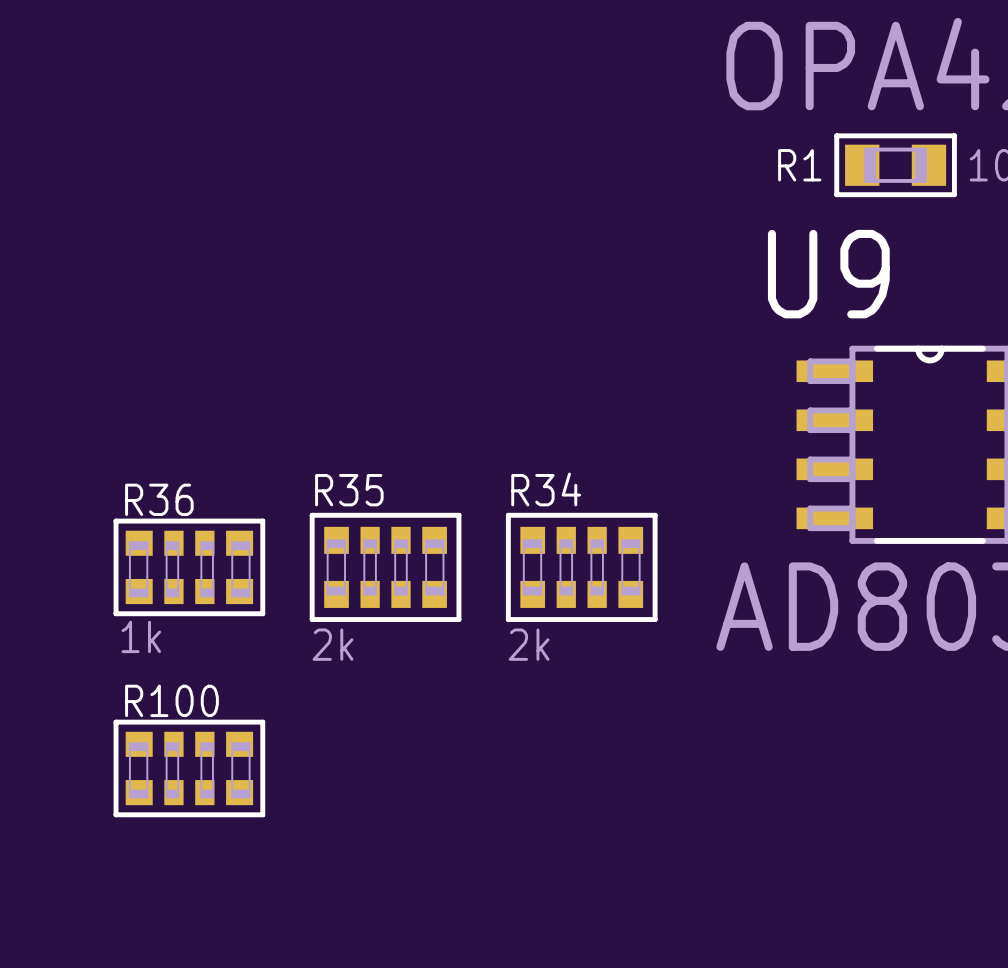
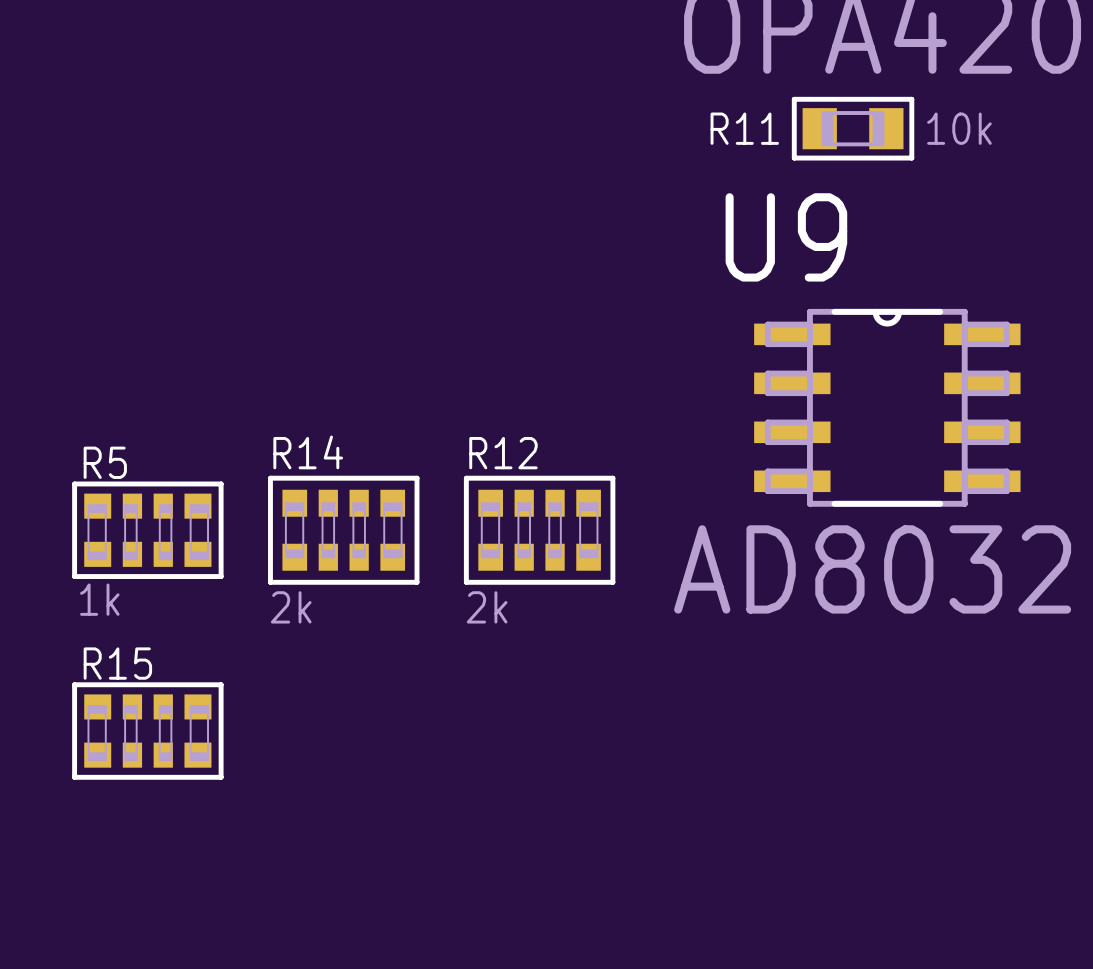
R1 name: R1 (799, 165) -> R11 (744, 128)
R34 name: R34 (546, 489) -> R12 (503, 453)
R35 name: R35 (349, 490) -> R14 (308, 452)
R36 name: R36 (159, 499) -> R5 (105, 462)
R100 name: R100 (171, 700) -> R15 (117, 663)

